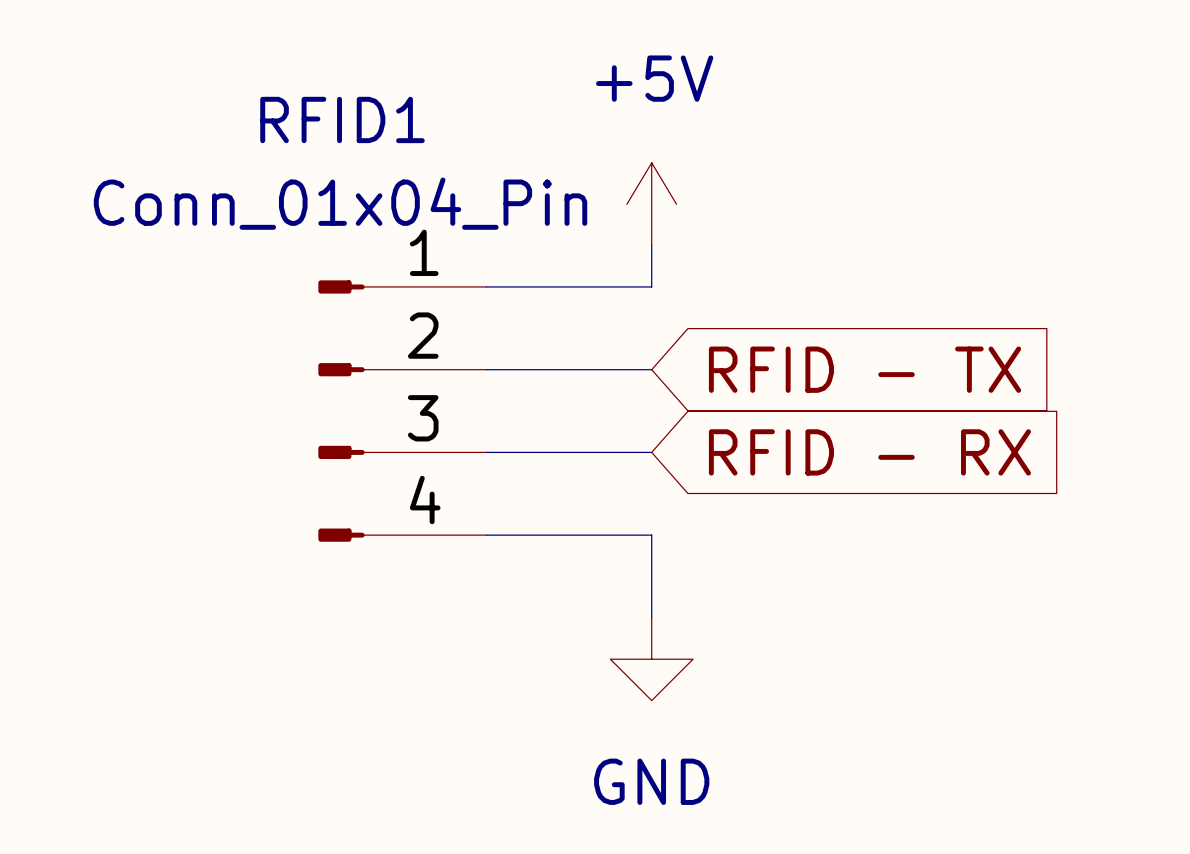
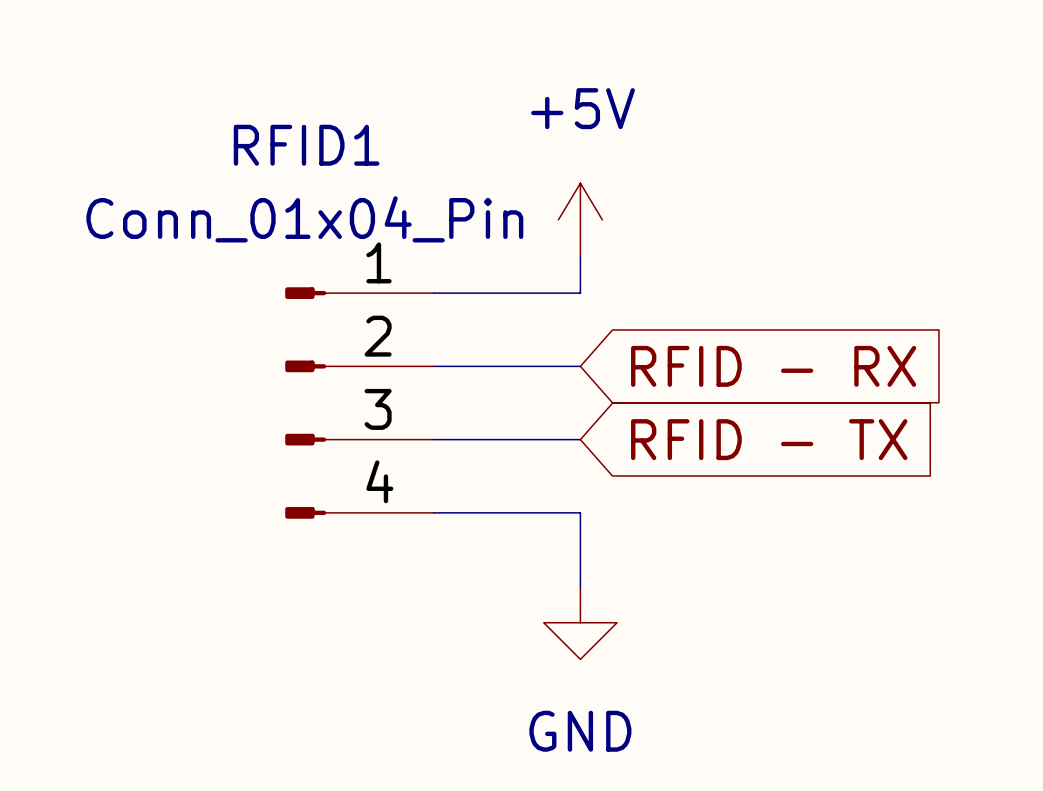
global label: RFID - TX (864, 369) -> RFID - RX (773, 366)
global label: RFID - RX (869, 452) -> RFID - TX (769, 439)

